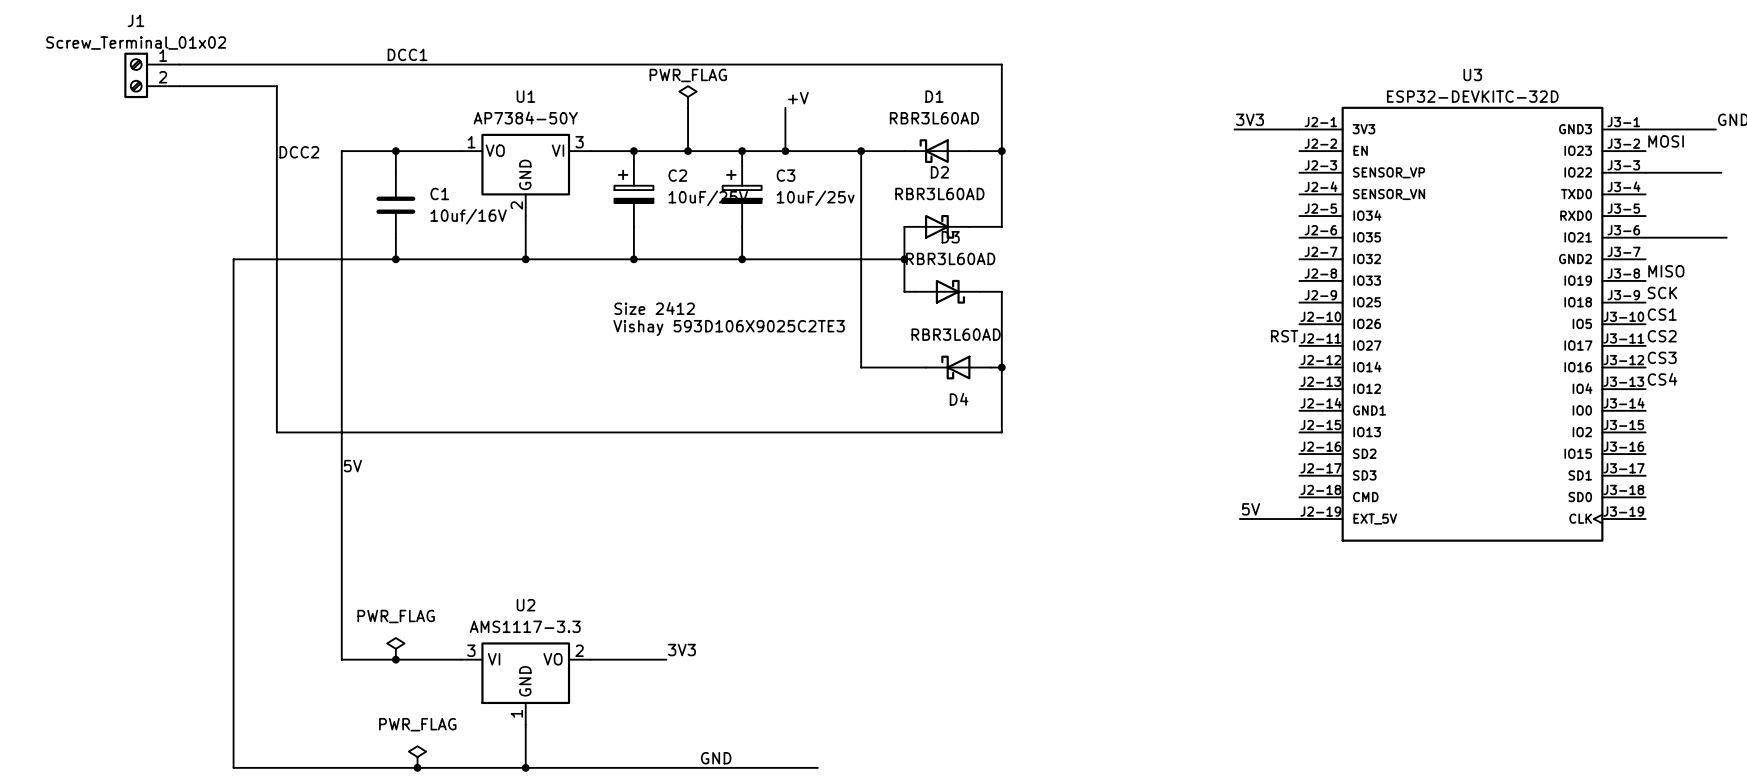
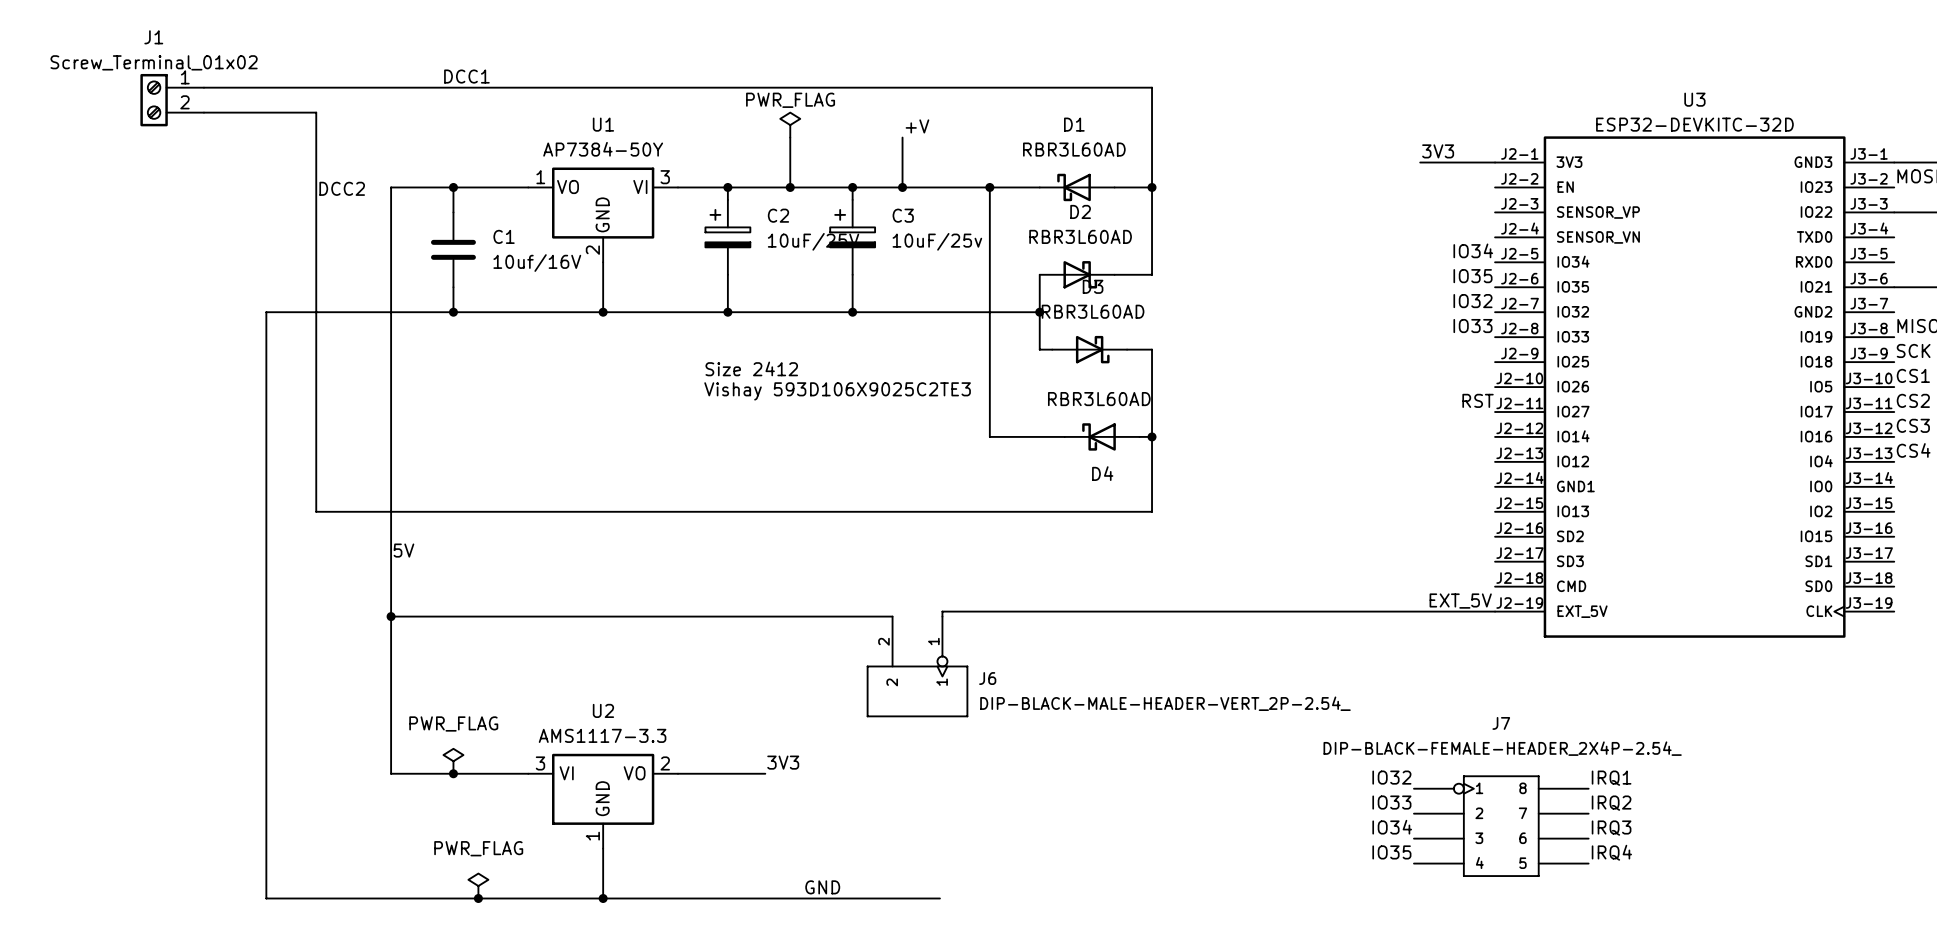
label: none -> IO34 (1473, 250)
label: none -> IO35 (1472, 276)
label: none -> IO32 (1472, 301)
label: none -> IO33 (1472, 326)
label: 5V (1251, 509) -> EXT_5V (1460, 601)
wire: none -> (1426, 611) (942, 611) (942, 616)
wire: none -> (391, 616) (892, 616)
junction: none -> (391, 616)
J6: none -> DIP-BLACK-MALE-HEADER-VERT_2P-2.54_ (917, 666)
label: none -> IO32 (1391, 777)
label: none -> IRQ1 (1611, 778)
label: none -> IO33 (1391, 802)
label: none -> IRQ2 (1611, 803)
J7: none -> DIP-BLACK-FEMALE-HEADER_2X4P-2.54_ (1501, 826)
label: none -> IO34 (1392, 827)
label: none -> IRQ3 (1611, 828)
label: none -> IO35 (1391, 852)
label: none -> IRQ4 (1611, 852)

